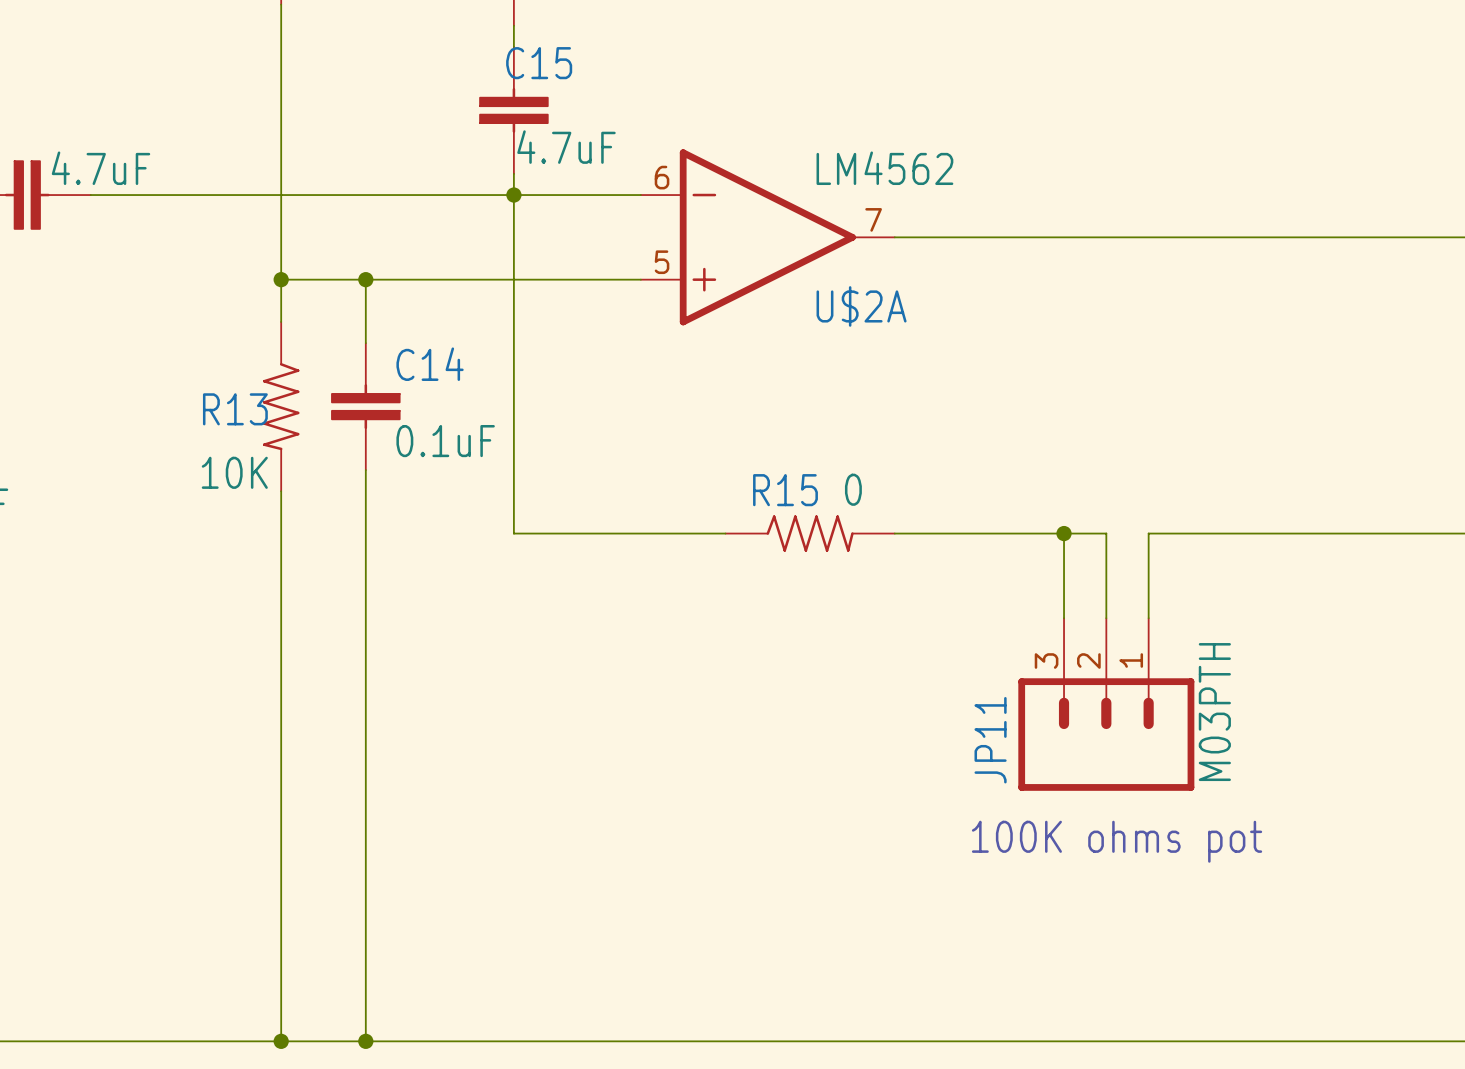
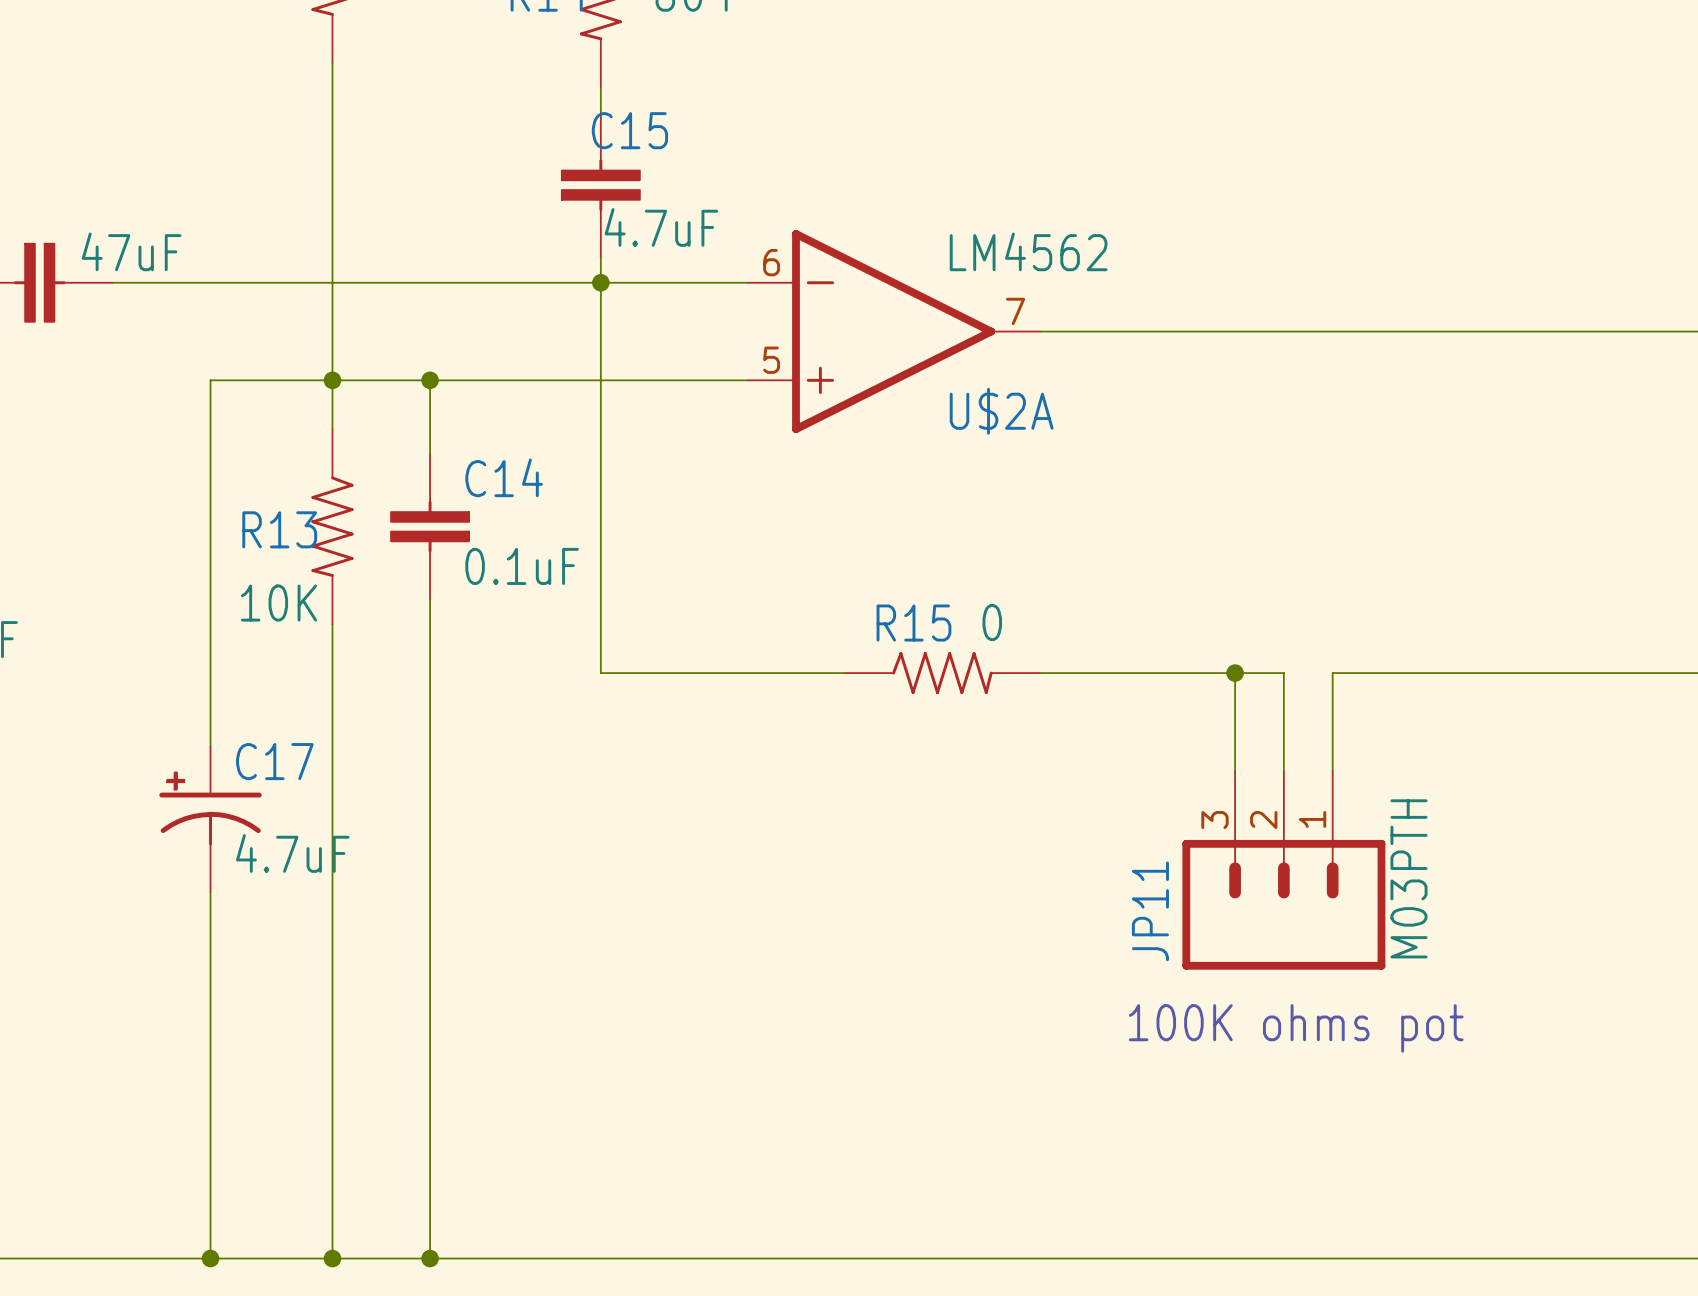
part value: 4.7uF (101, 168) -> 47uF (131, 251)
wire: none -> (332, 380) (210, 380) (210, 746)
C17: none -> 4.7uF (210, 819)
wire: none -> (210, 892) (210, 1258)
junction: none -> (210, 1258)

